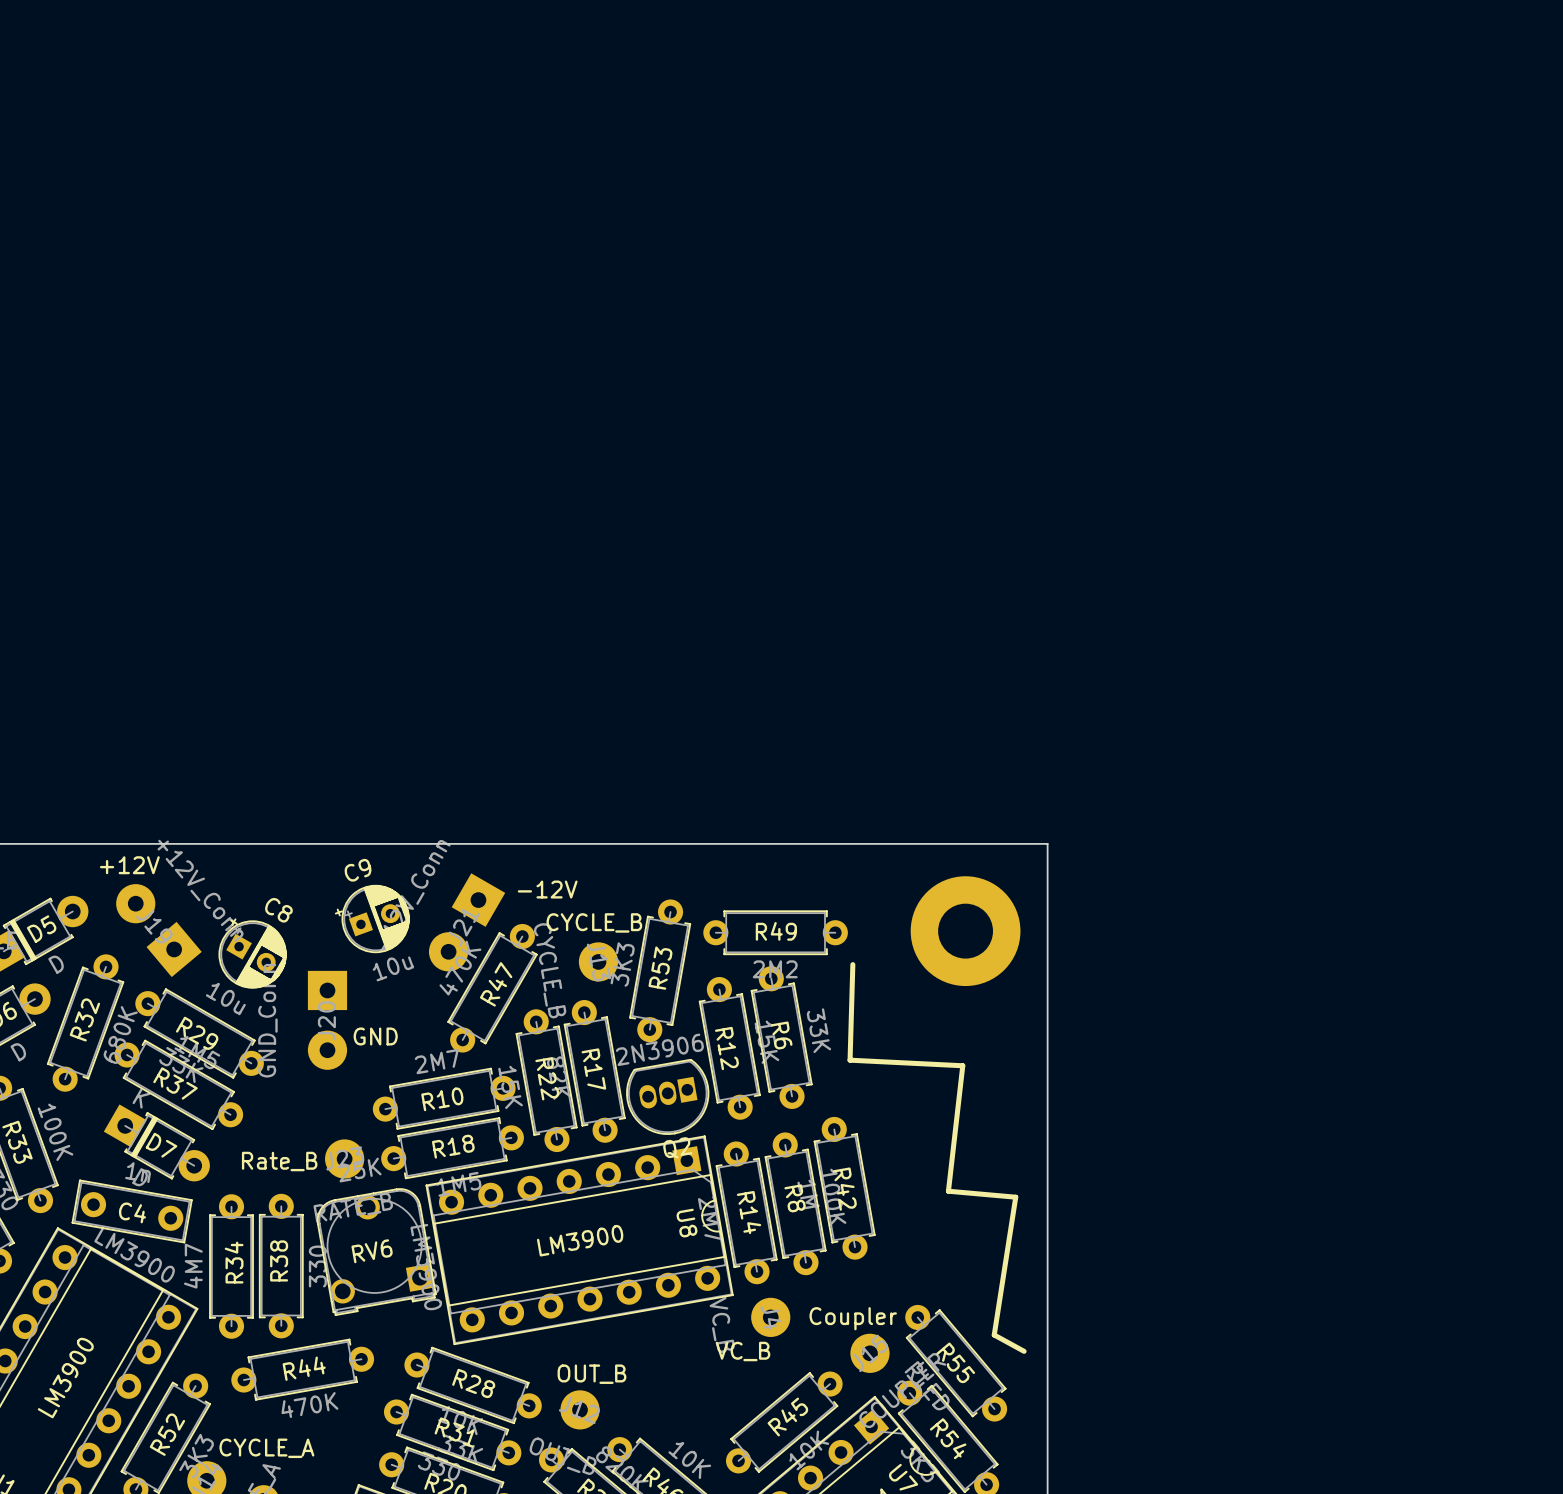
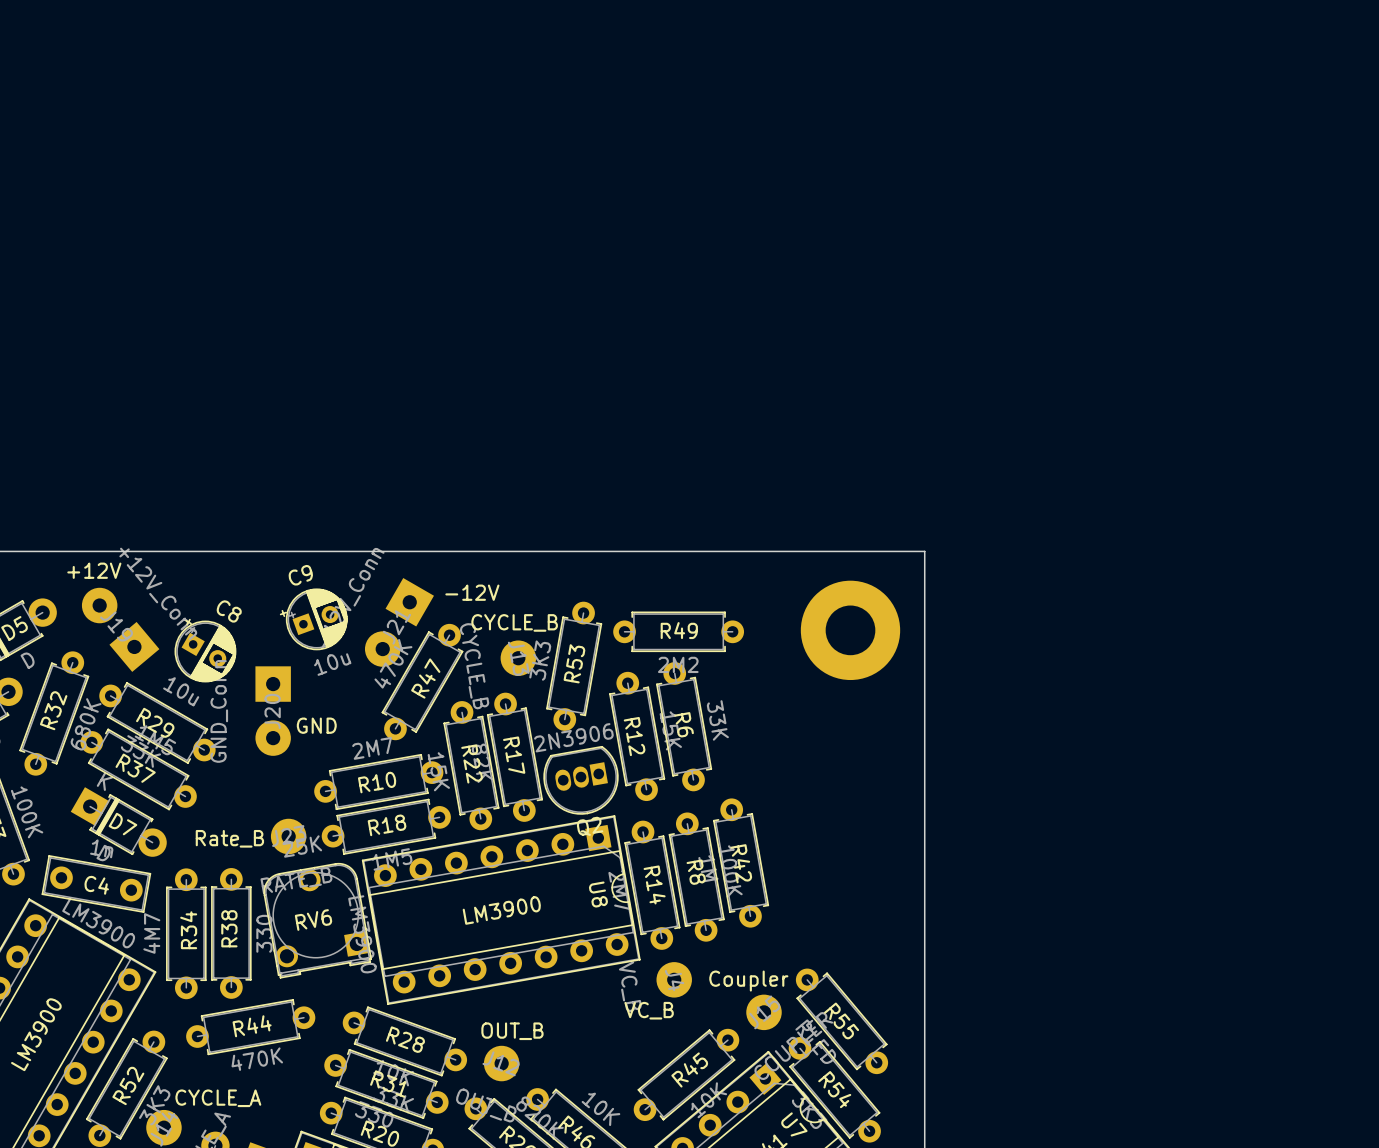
line: (852, 964) (850, 1060) (962, 1065) (948, 1191) (1015, 1197) (994, 1335) (1024, 1351) -> none

